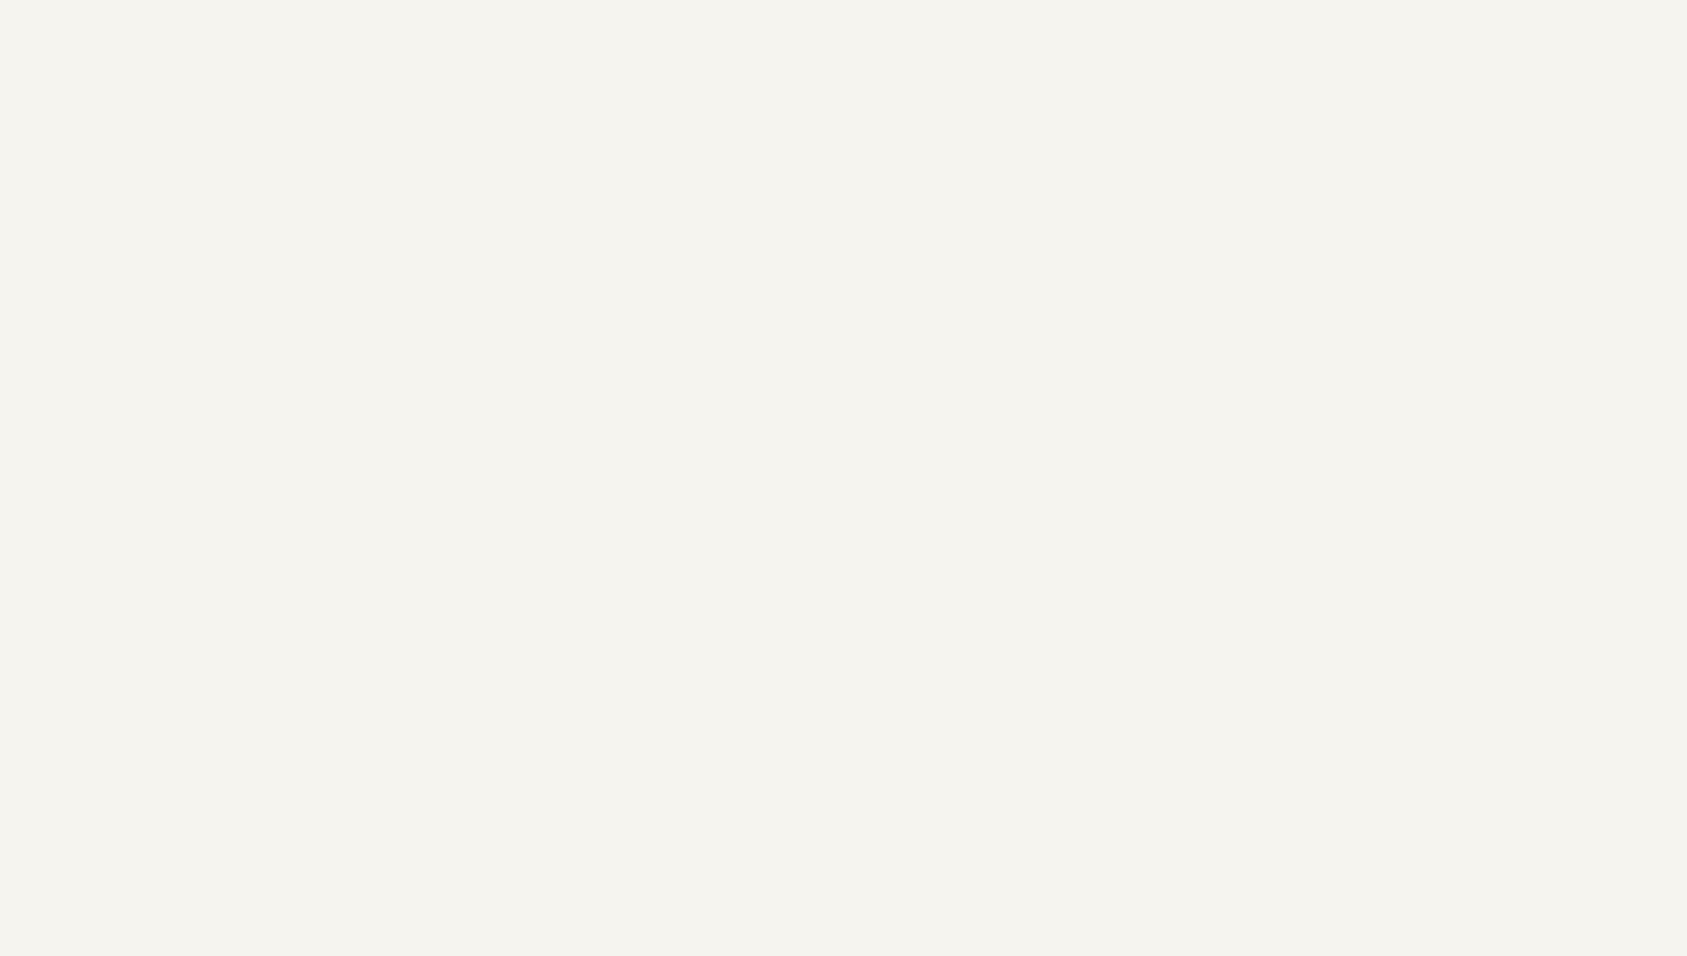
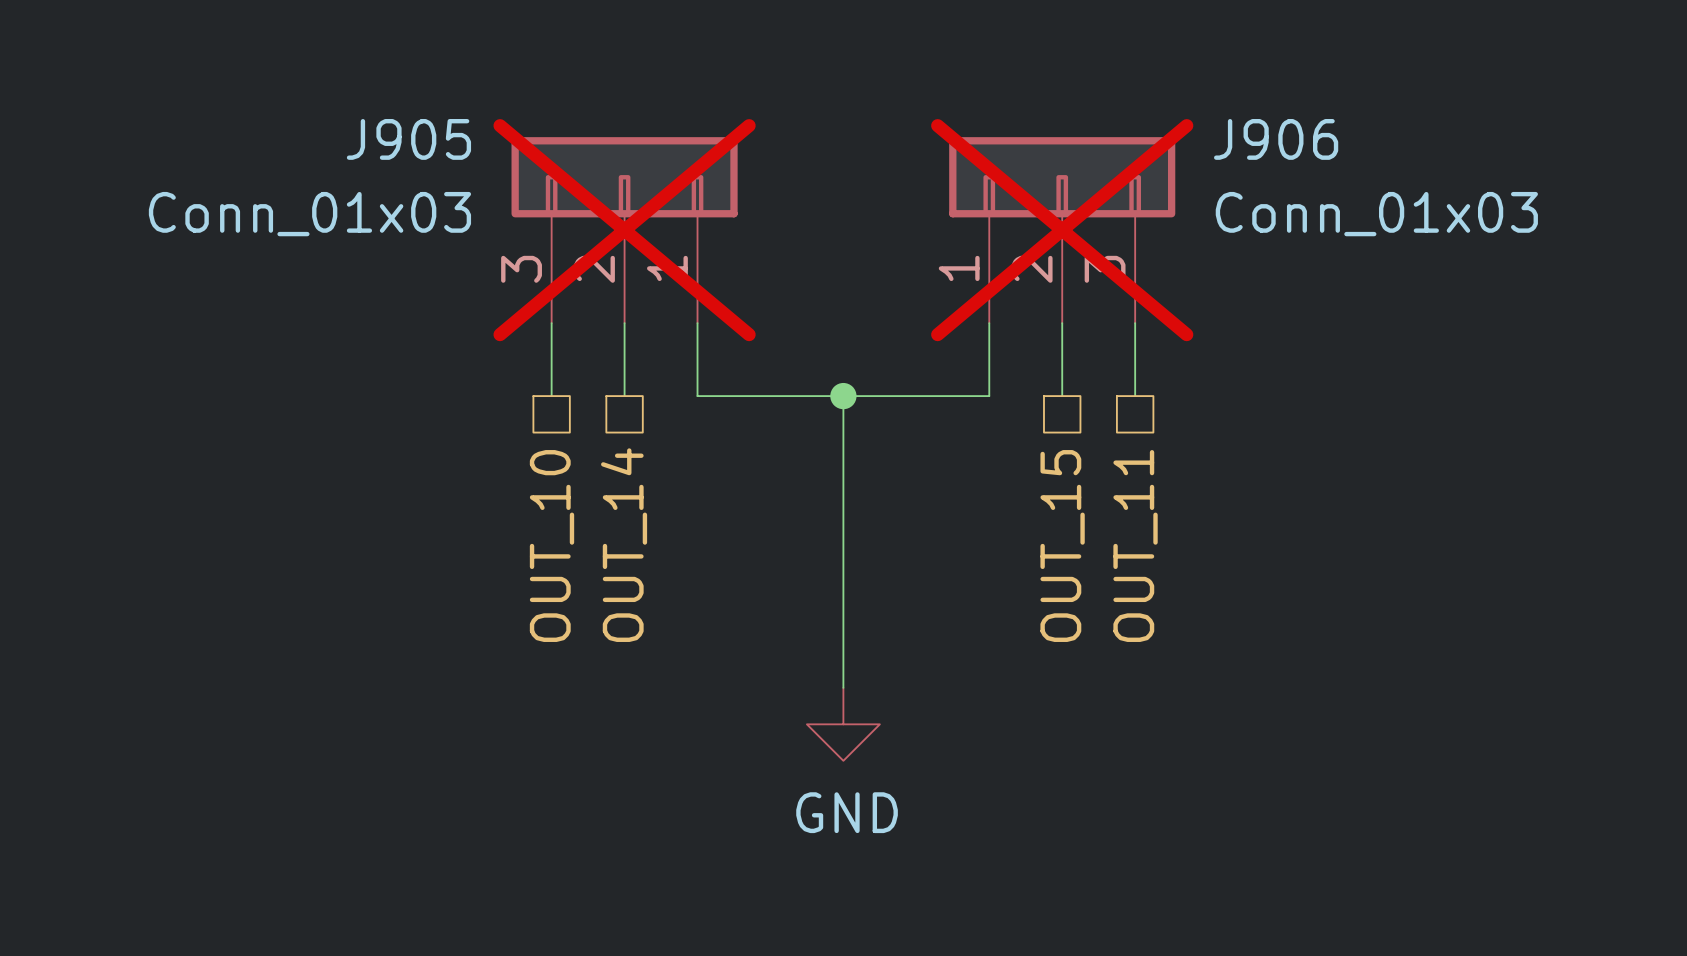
J905: none -> Conn_01x03 (624, 230)
J906: none -> Conn_01x03 (1062, 230)
wire: none -> (551, 323) (551, 396)
wire: none -> (624, 323) (624, 396)
wire: none -> (697, 323) (697, 396) (989, 396) (989, 323)
wire: none -> (1062, 323) (1062, 396)
wire: none -> (1135, 323) (1135, 396)
wire: none -> (843, 396) (843, 687)
junction: none -> (843, 396)
hierarchical label: none -> OUT_14 (624, 545)
hierarchical label: none -> OUT_10 (552, 546)
hierarchical label: none -> OUT_15 (1062, 546)
hierarchical label: none -> OUT_11 (1135, 546)
power symbol: none -> GND (843, 724)

